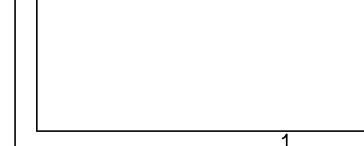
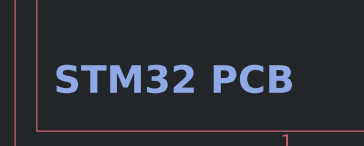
text: none -> STM32 PCB (174, 79)

